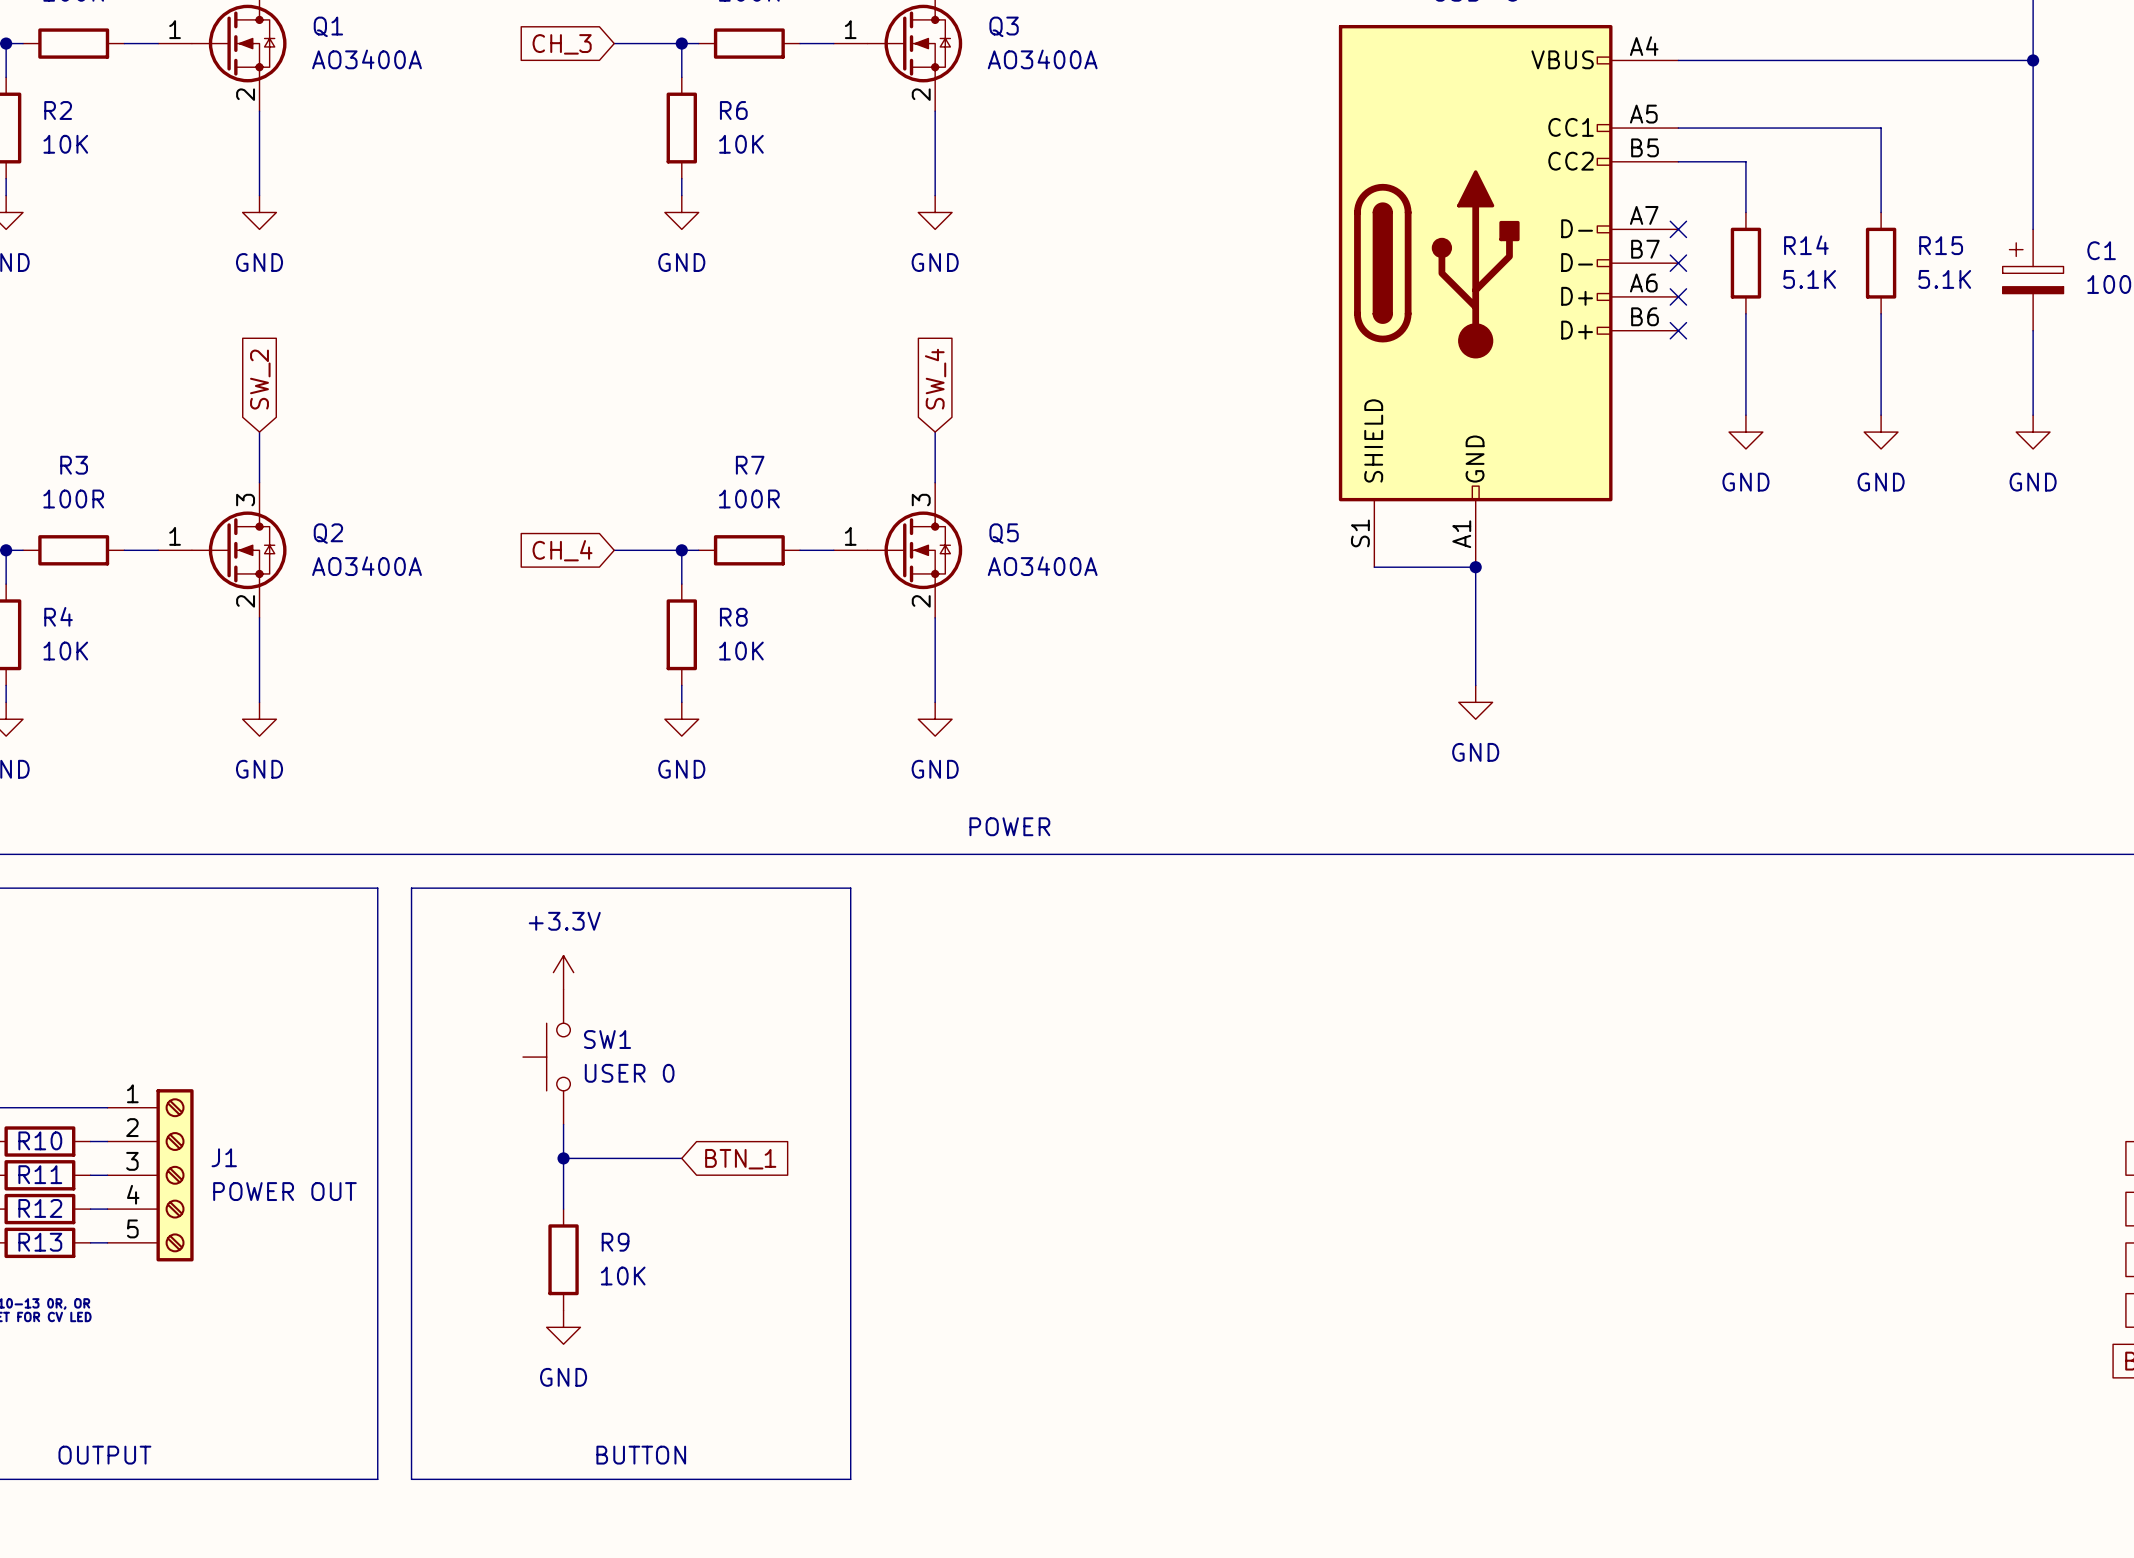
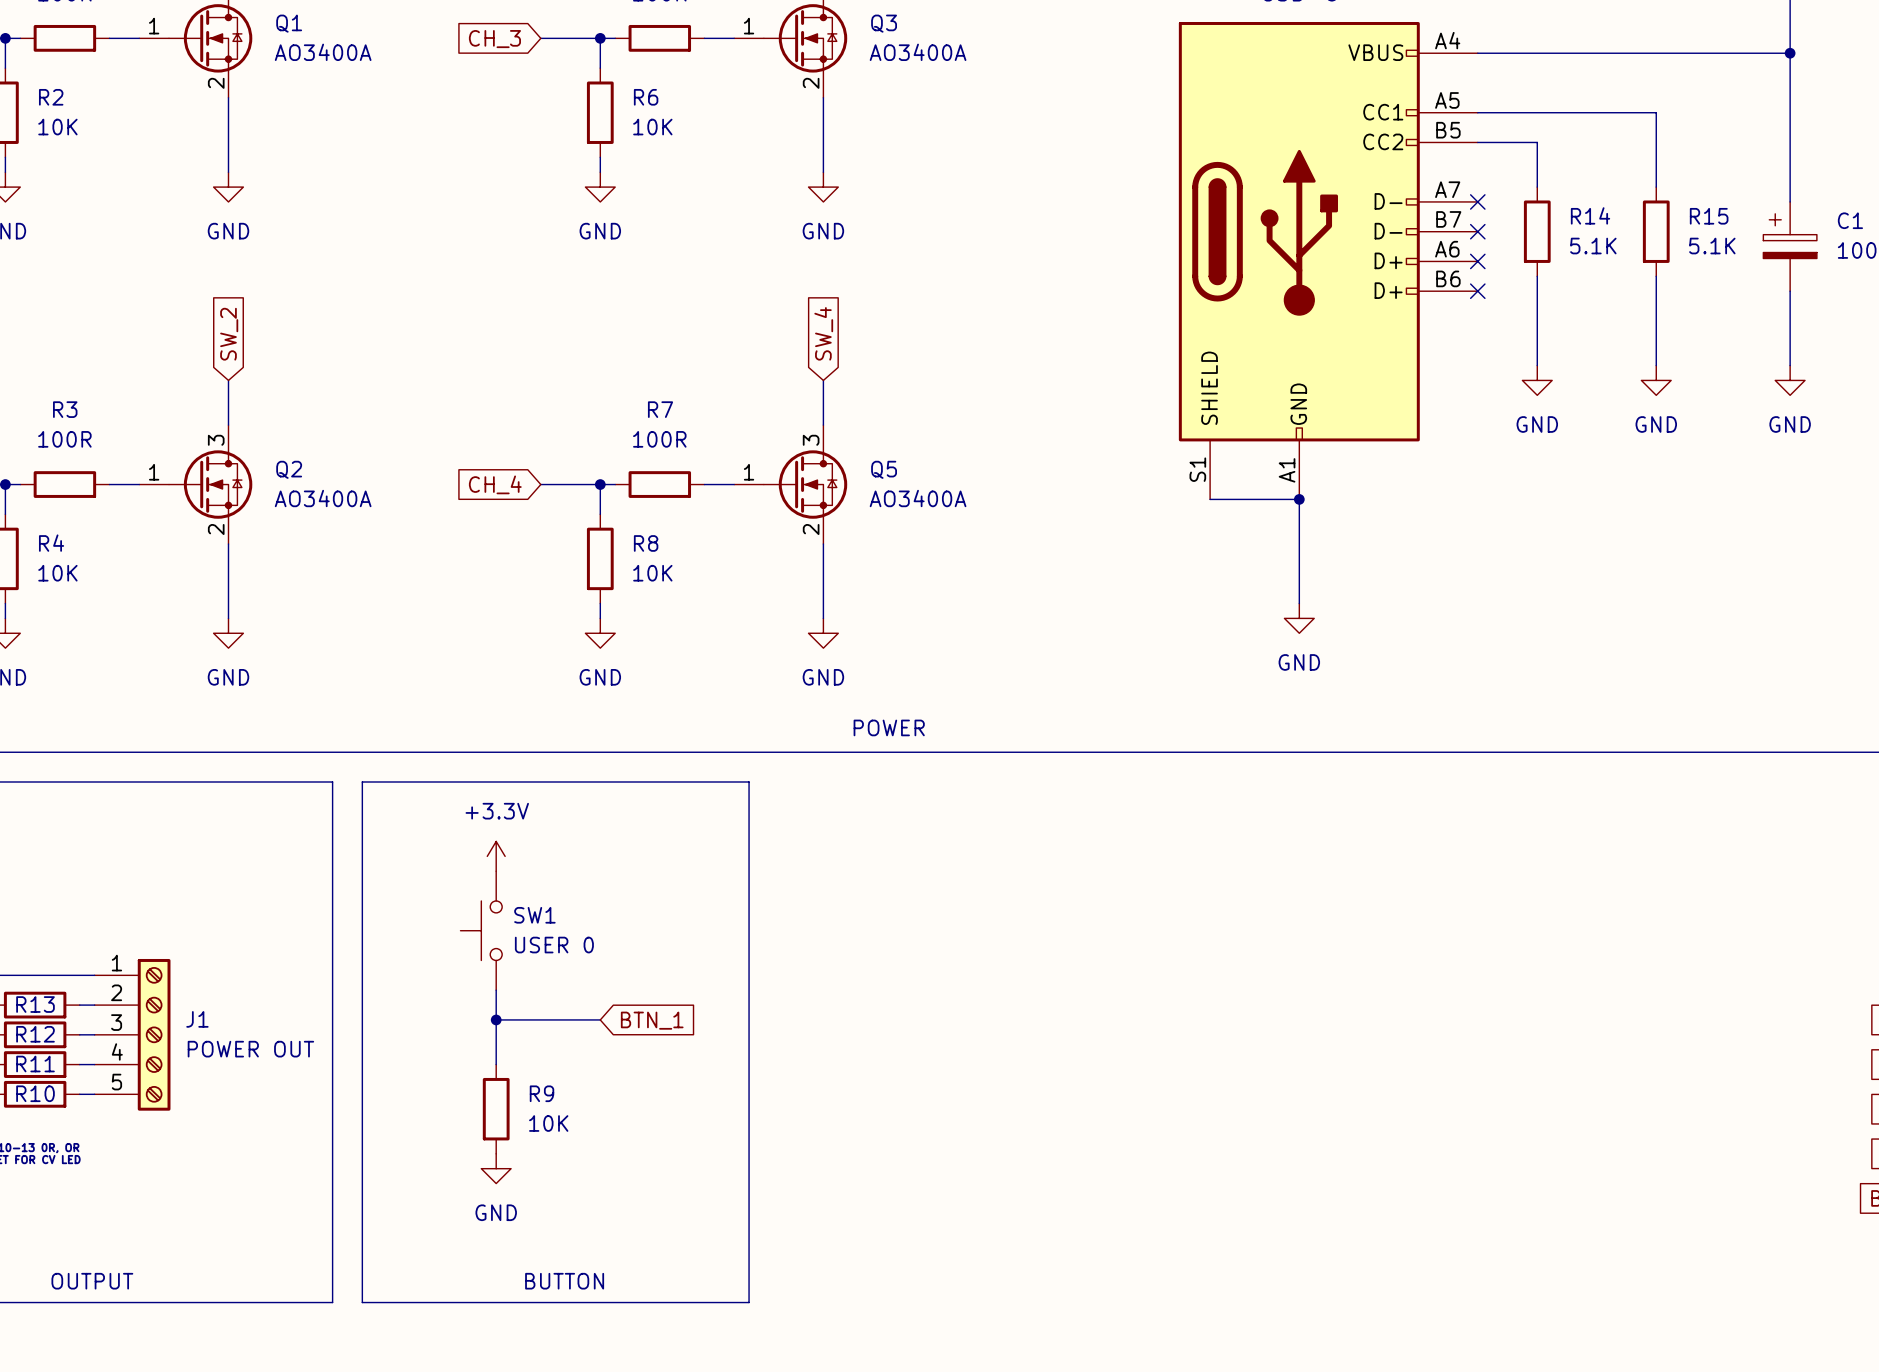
R10 name: R10 (40, 1140) -> R13 (35, 1004)
R11 name: R11 (40, 1174) -> R12 (35, 1034)
R12 name: R12 (40, 1208) -> R11 (35, 1064)
R13 name: R13 (40, 1242) -> R10 (35, 1093)

